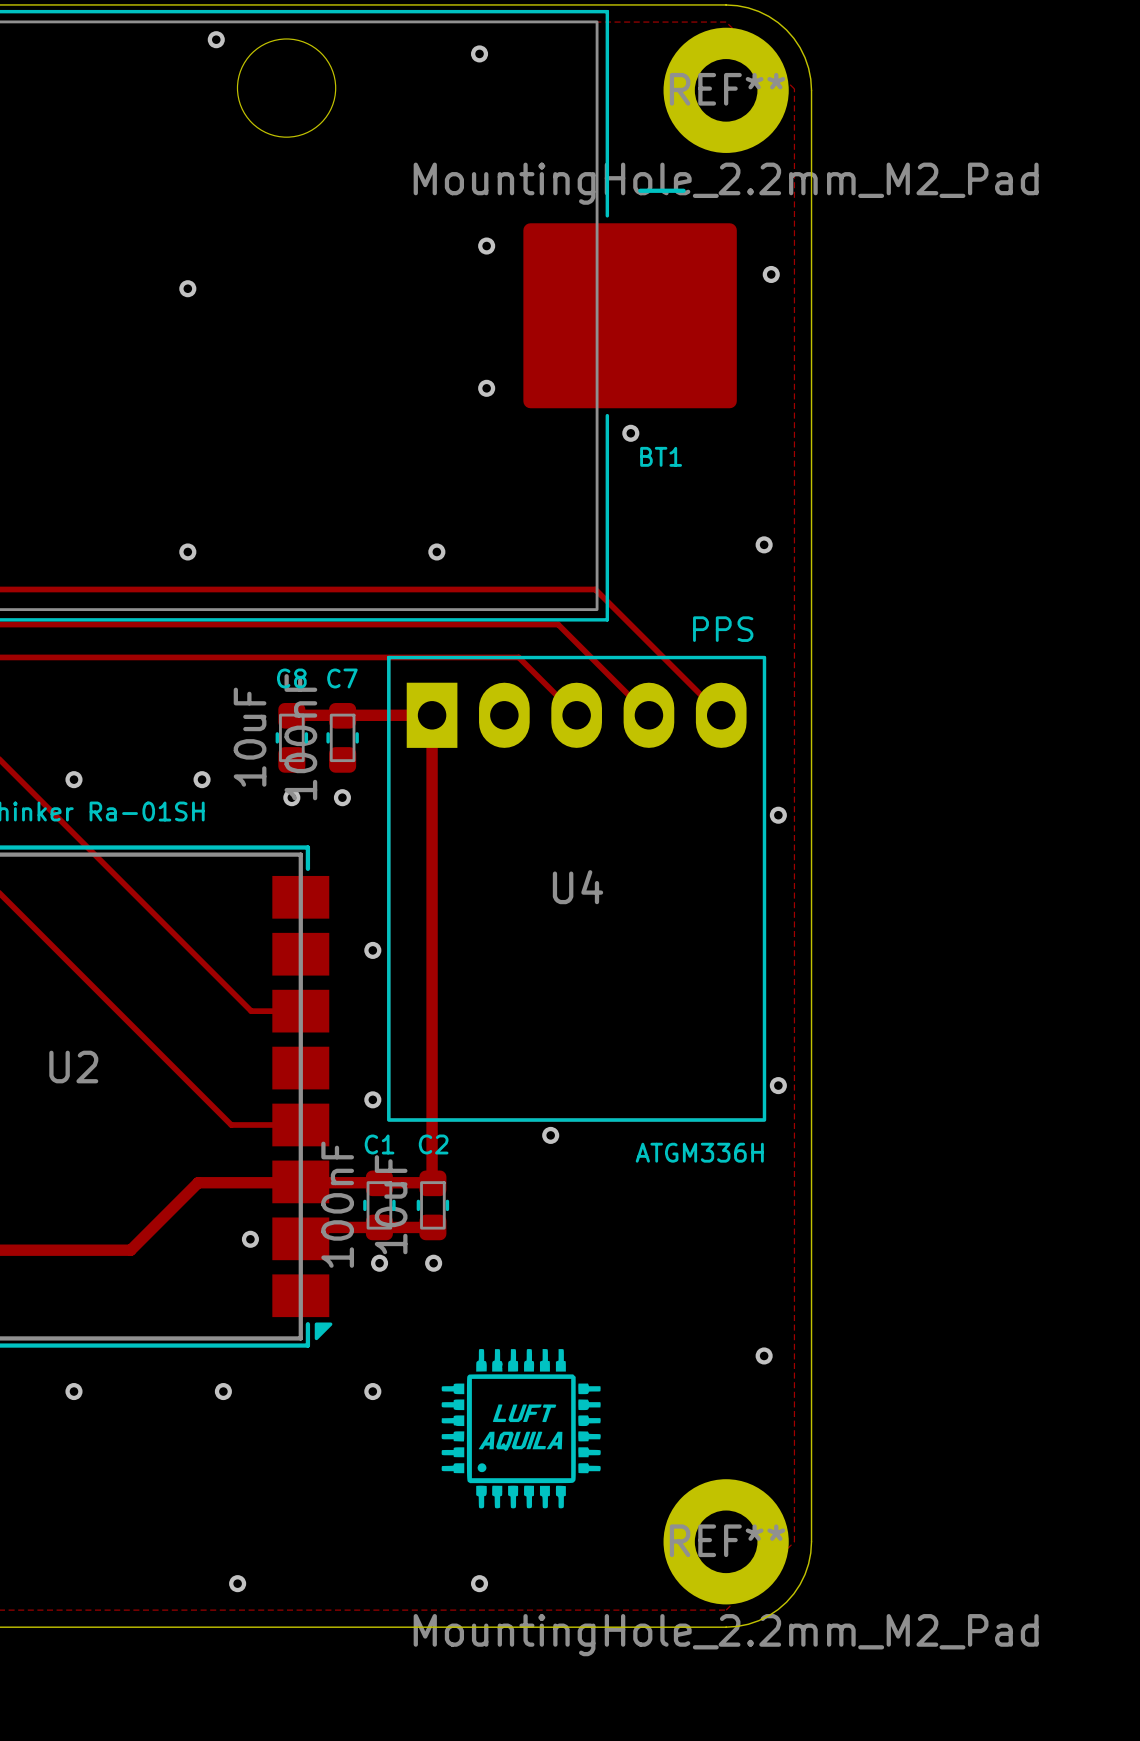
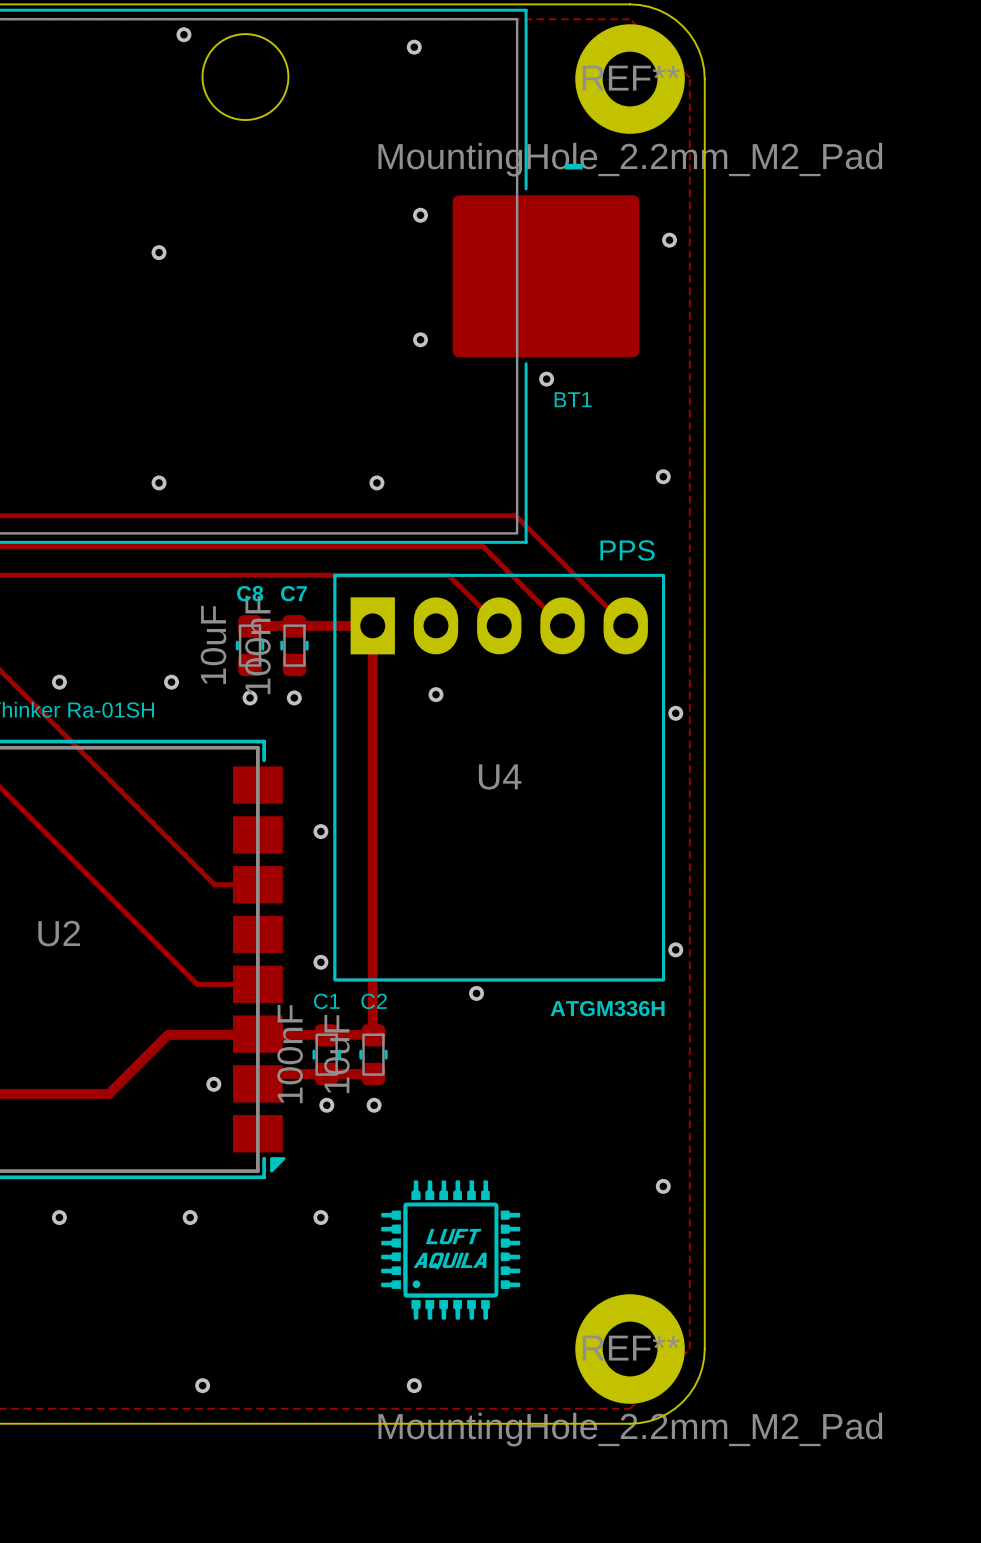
via: none -> (436, 694)

